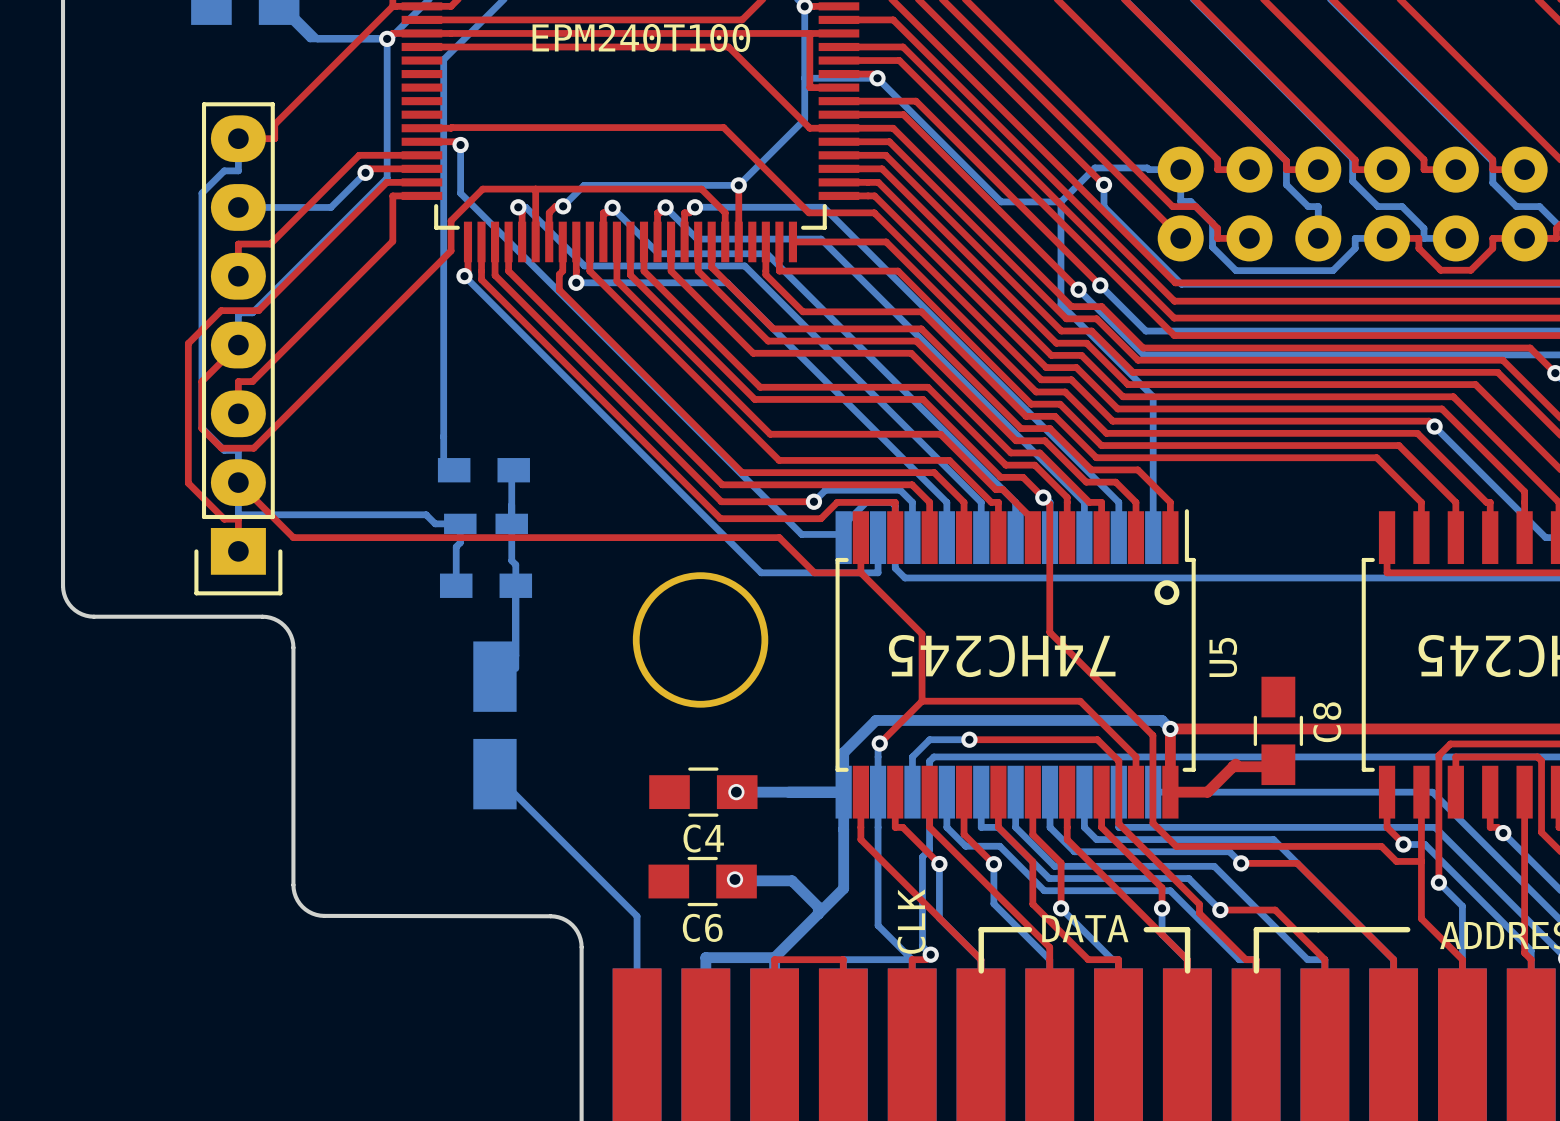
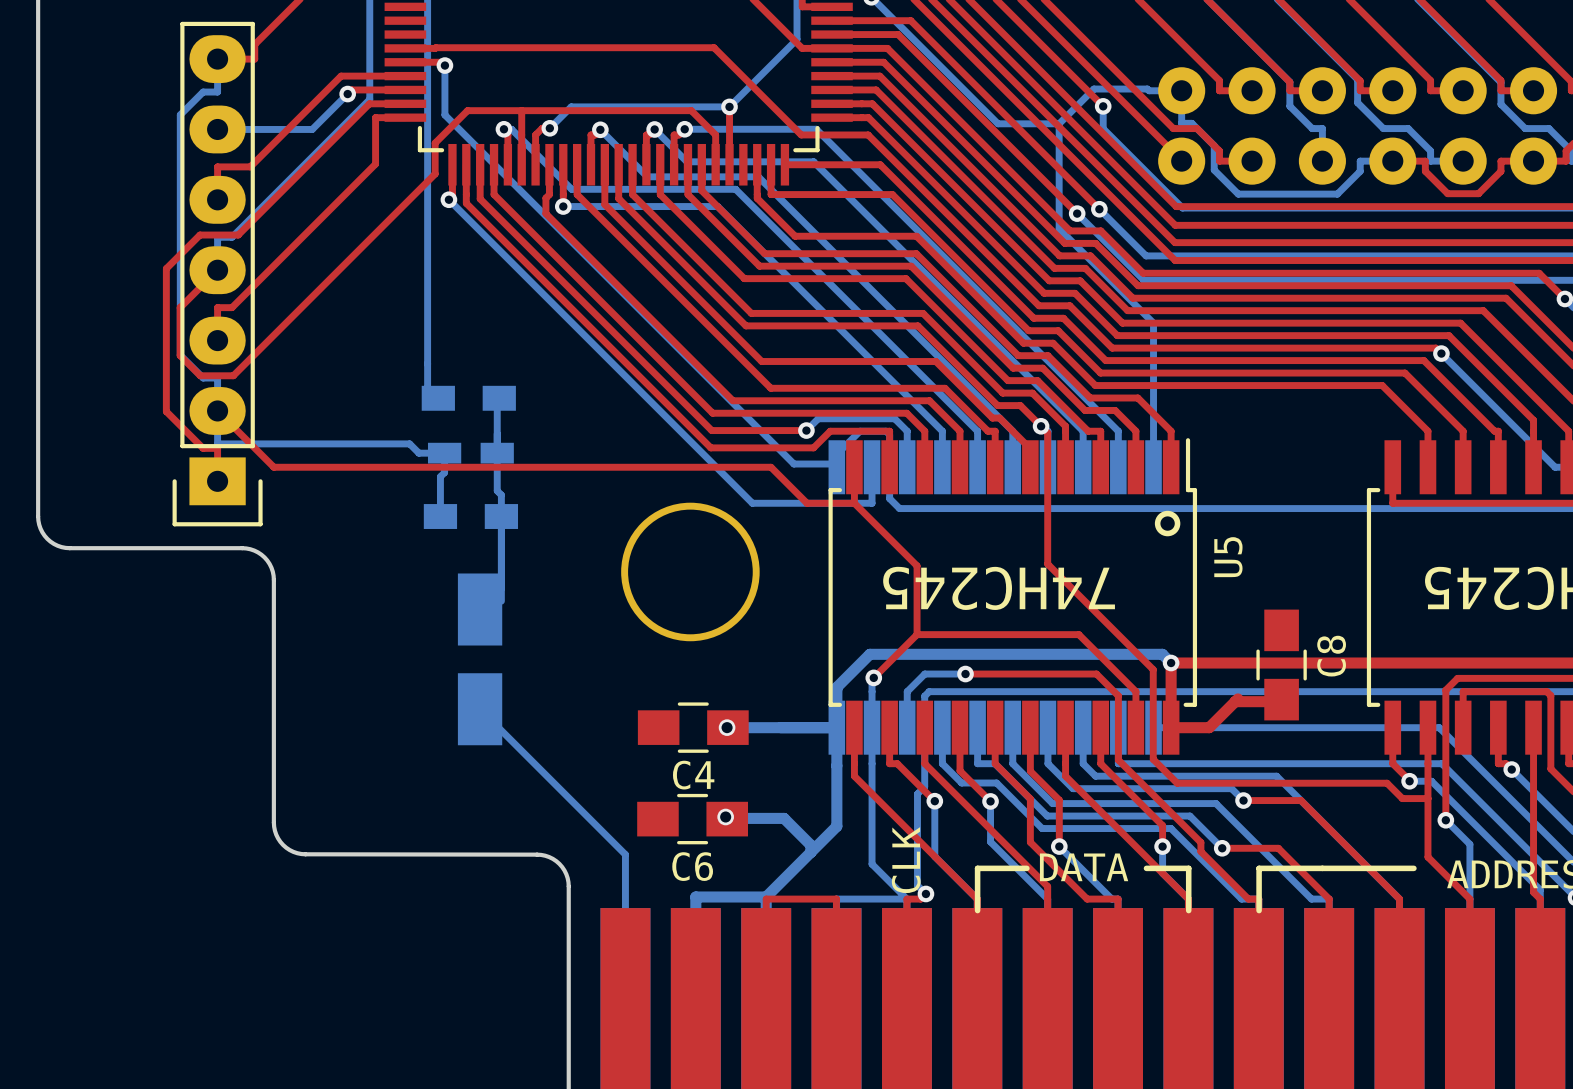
U5 name position: U5 (1223, 657) -> U5 (1228, 557)

